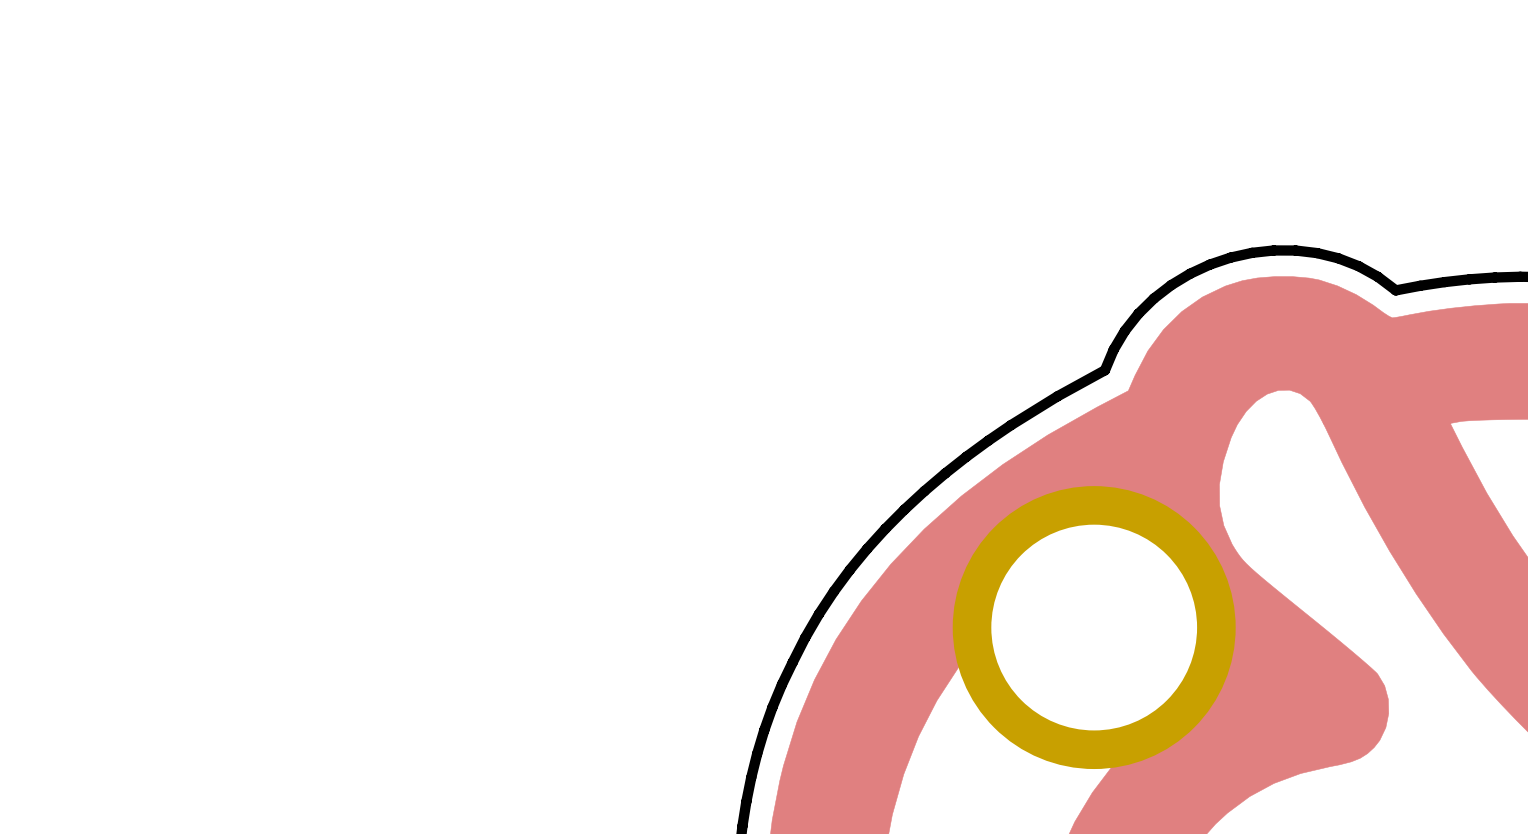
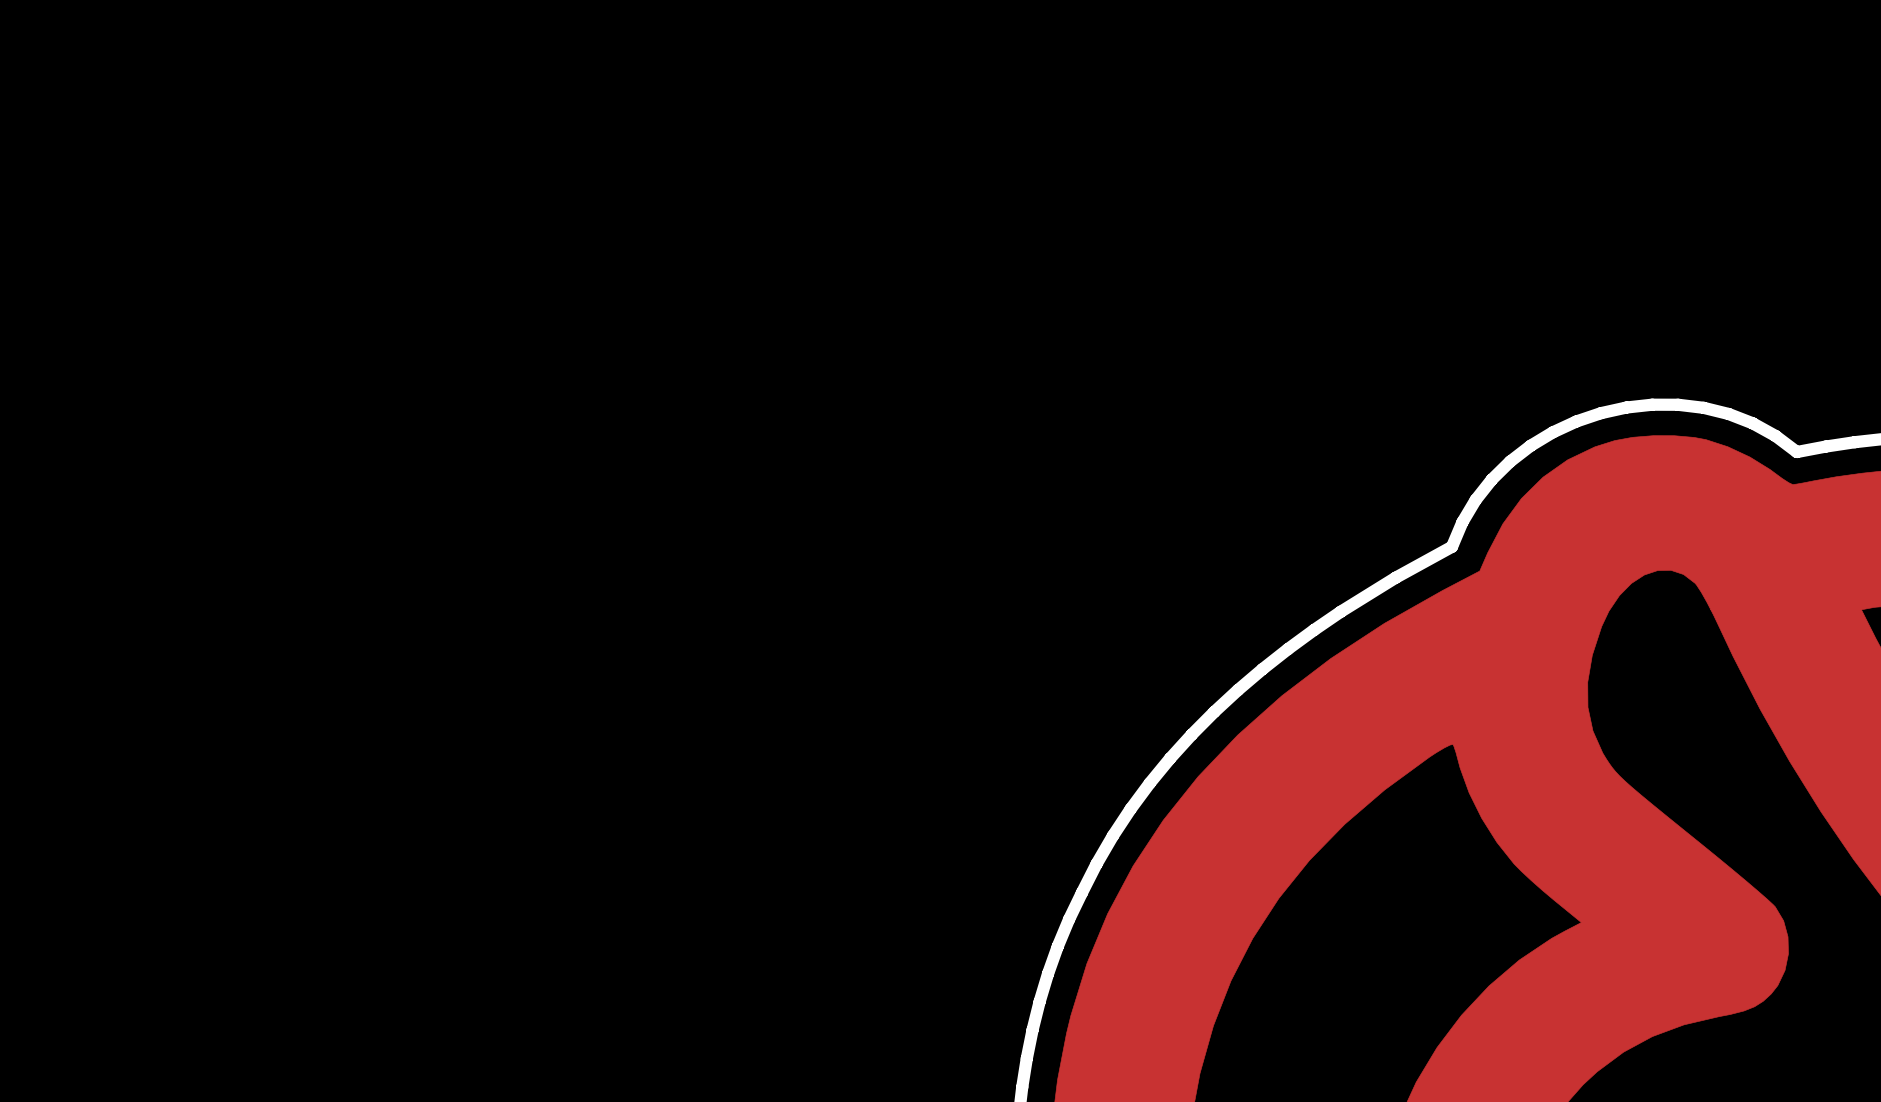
part: (1094, 627) -> none

